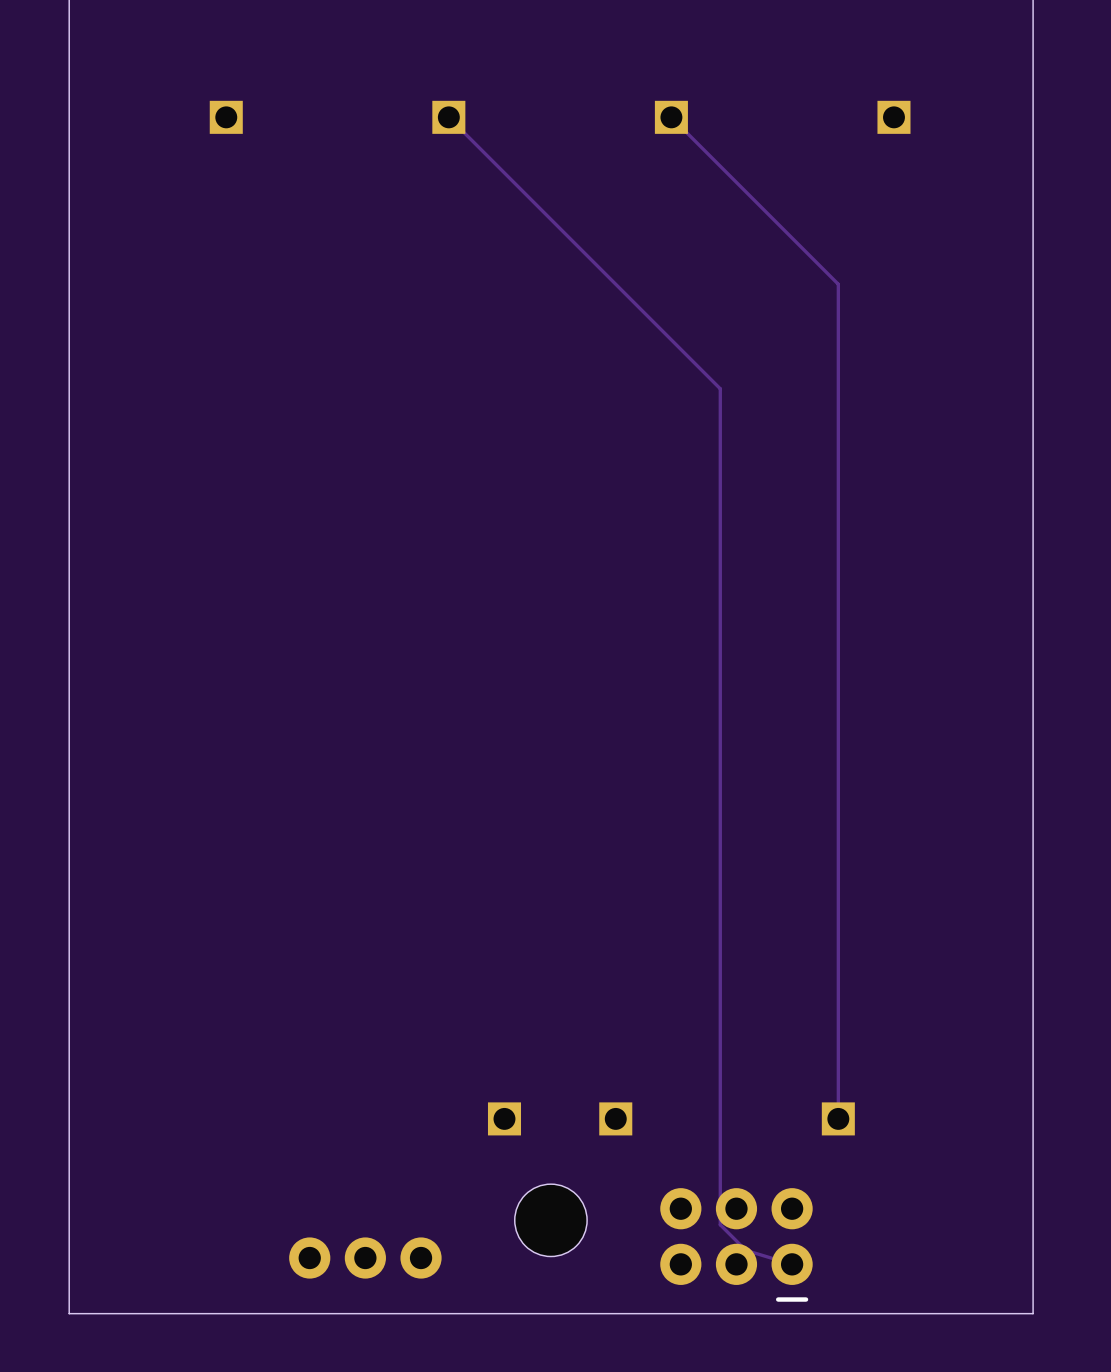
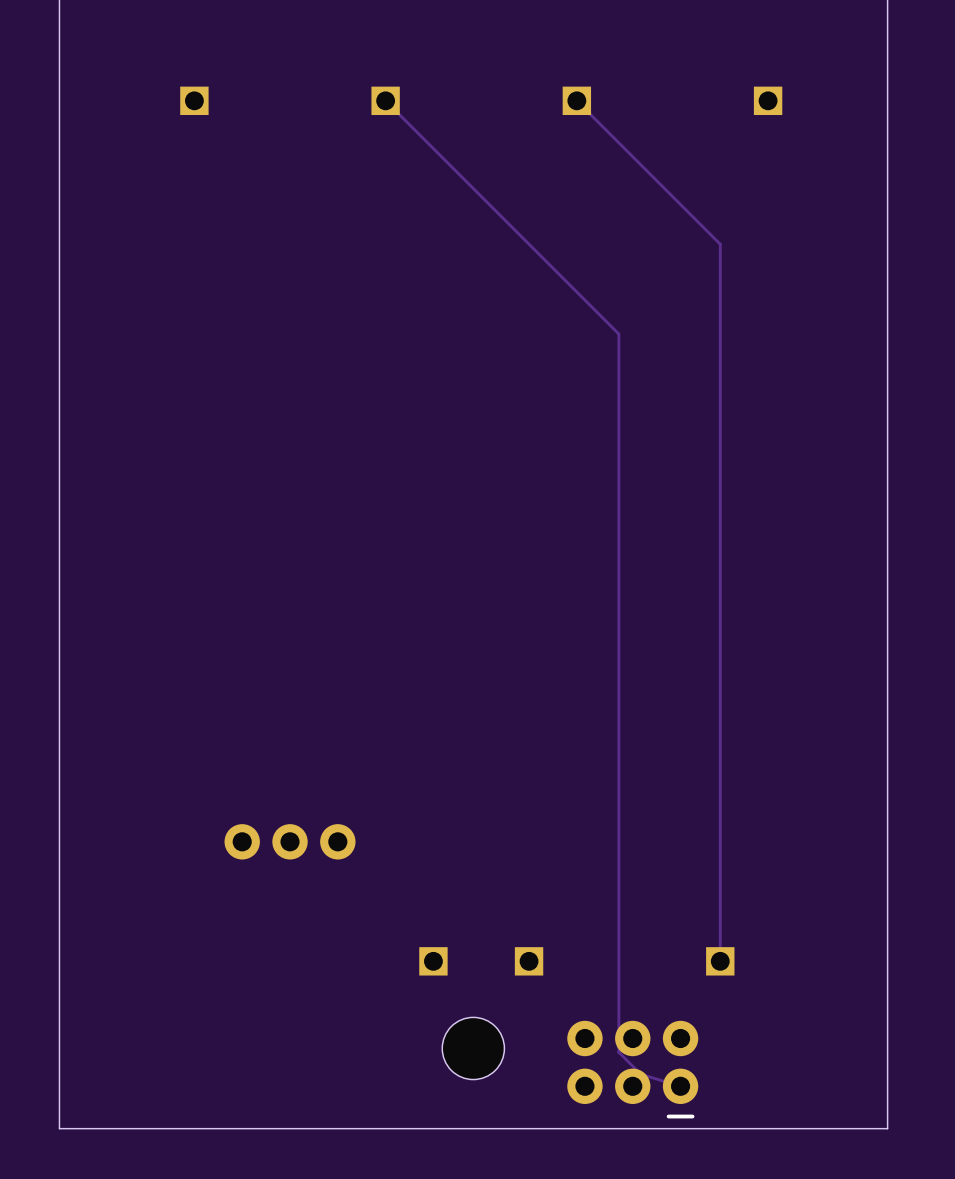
part position: (365, 1258) -> (290, 841)

